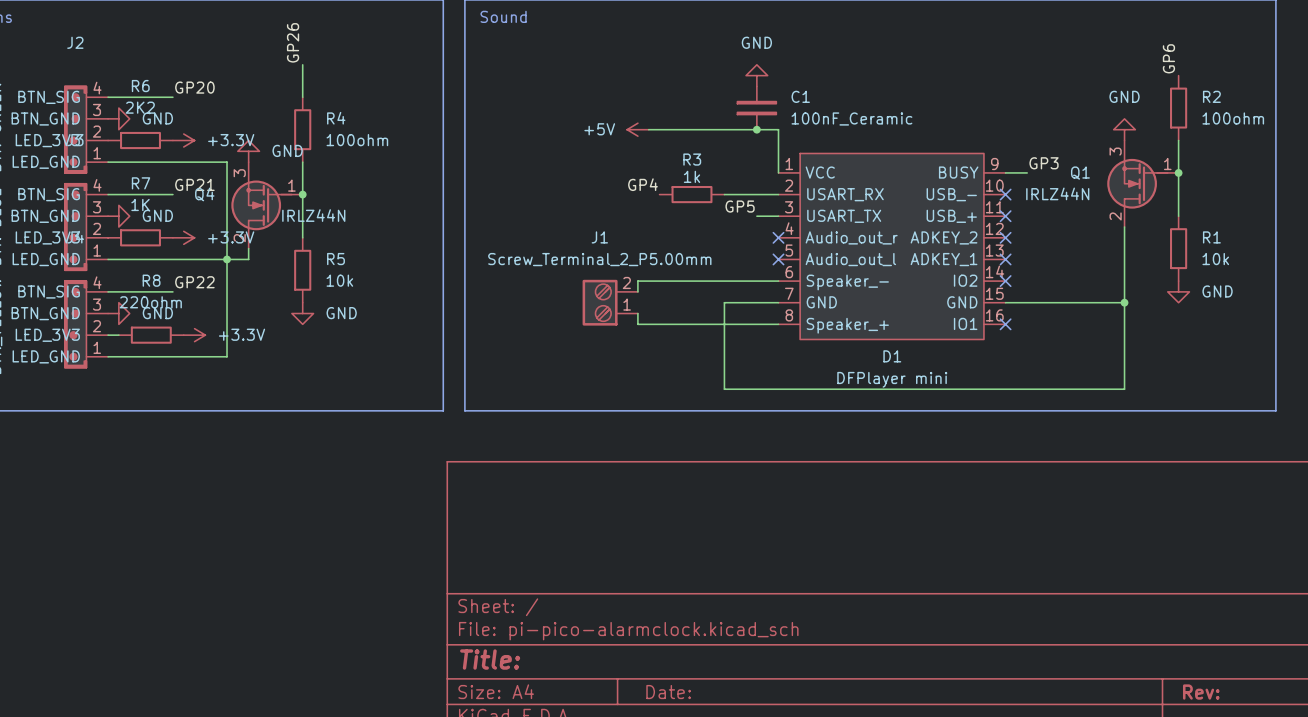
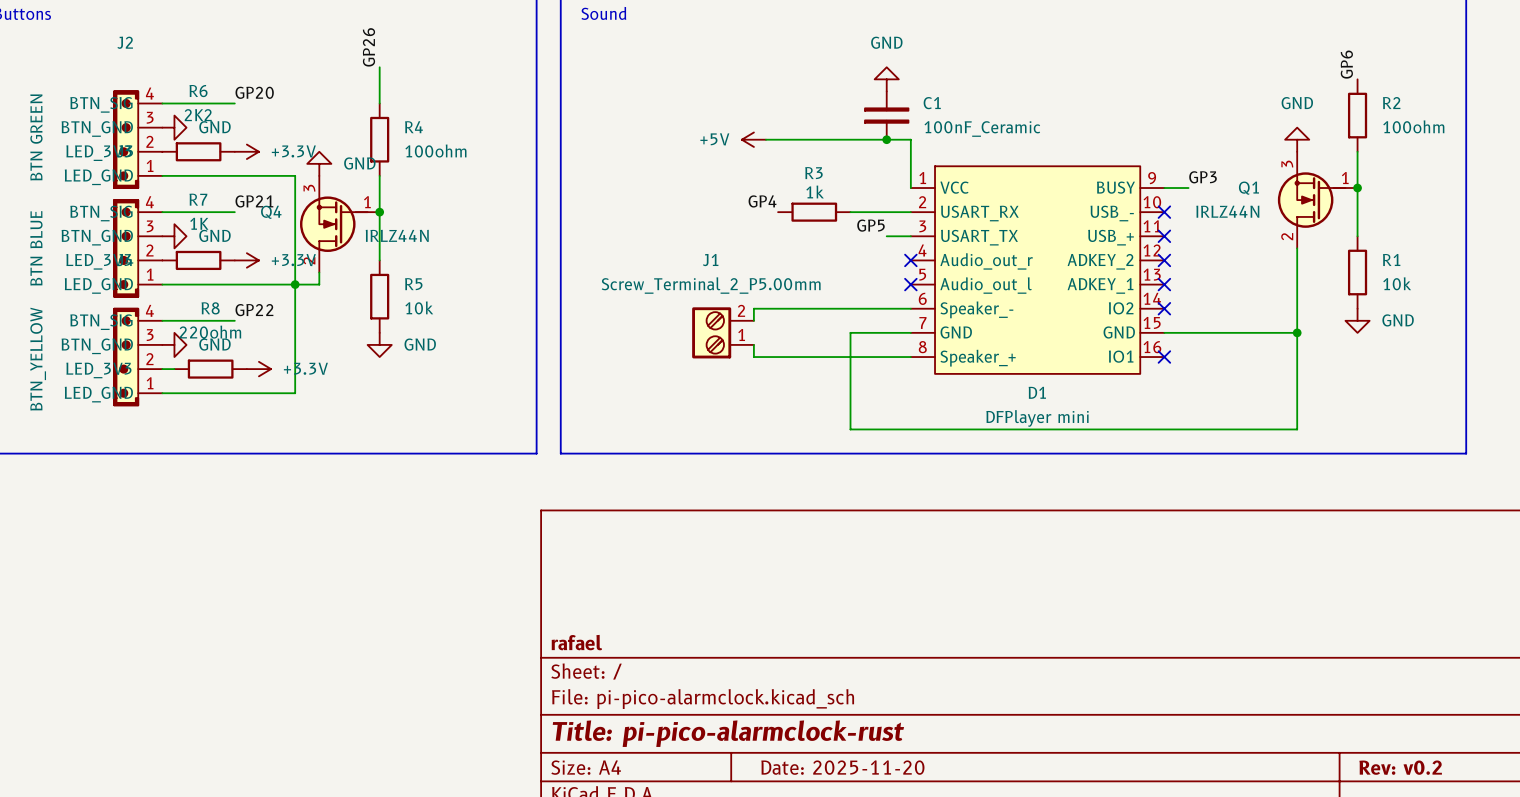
title block: none -> rafael (576, 642)
title block: Title: (490, 659) -> Title: pi-pico-alarmclock-rust (728, 733)
title block: Date: (668, 692) -> Date: 2025-11-20 (842, 767)
title block: Rev: (1201, 692) -> Rev: v0.2 (1400, 767)

